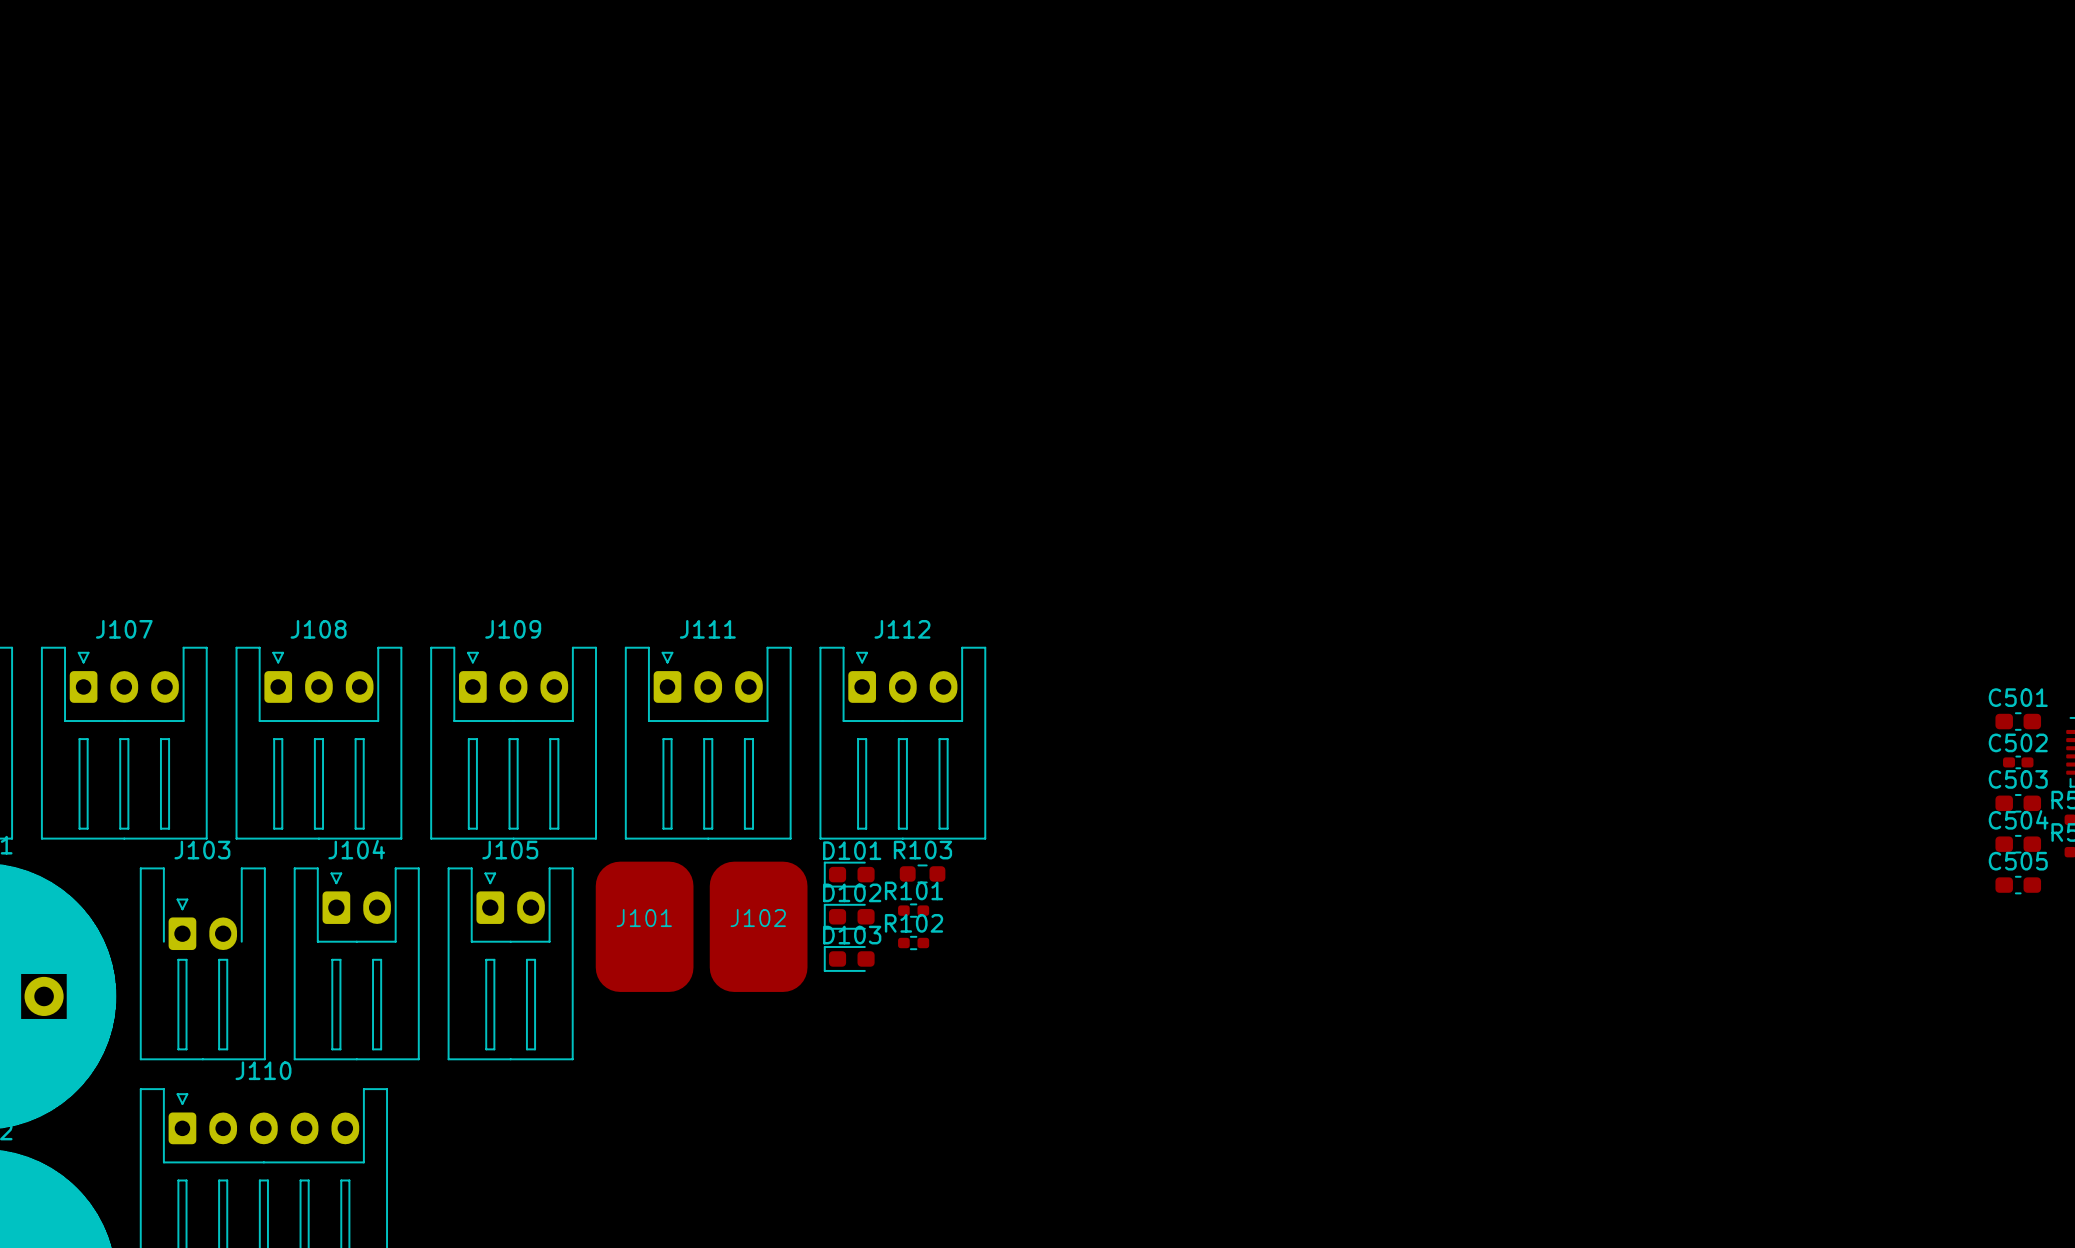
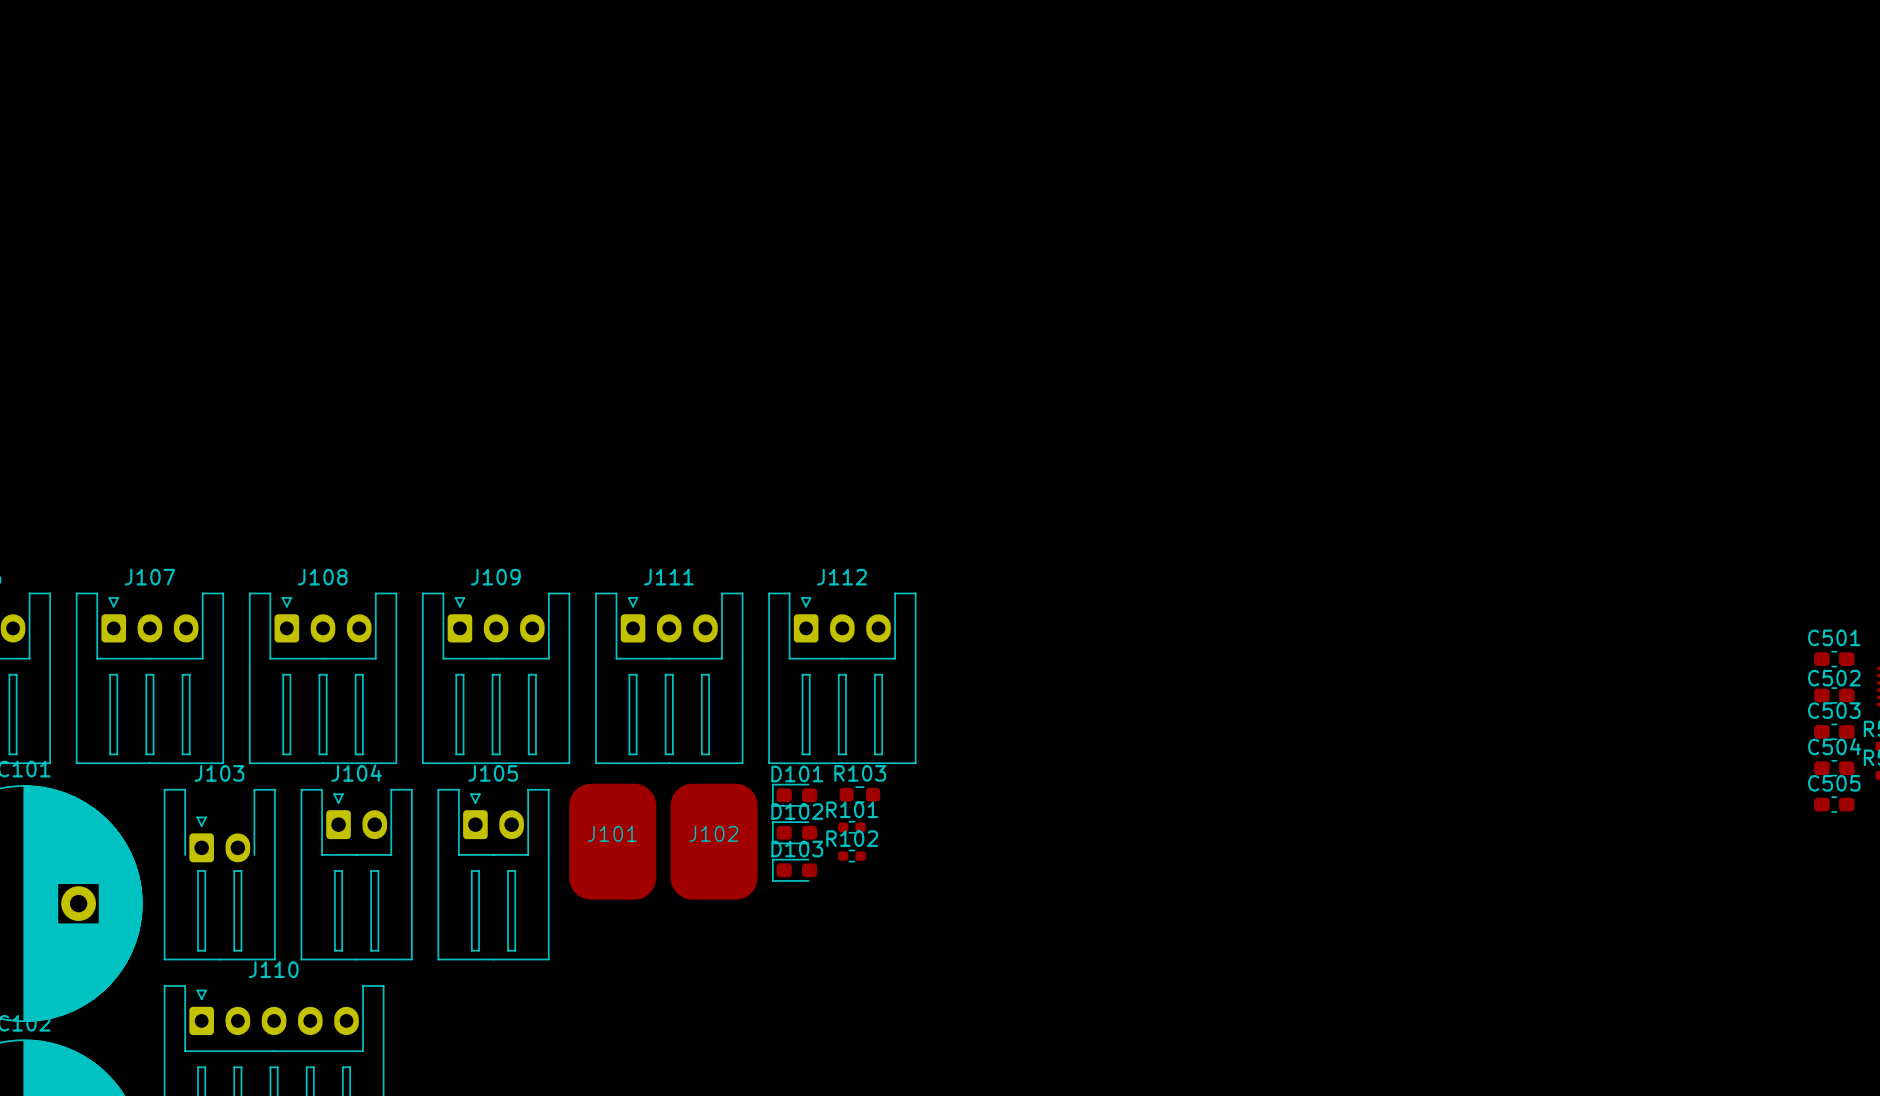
C502 footprint: [2003, 755, 2034, 770] -> [1814, 687, 1855, 704]

